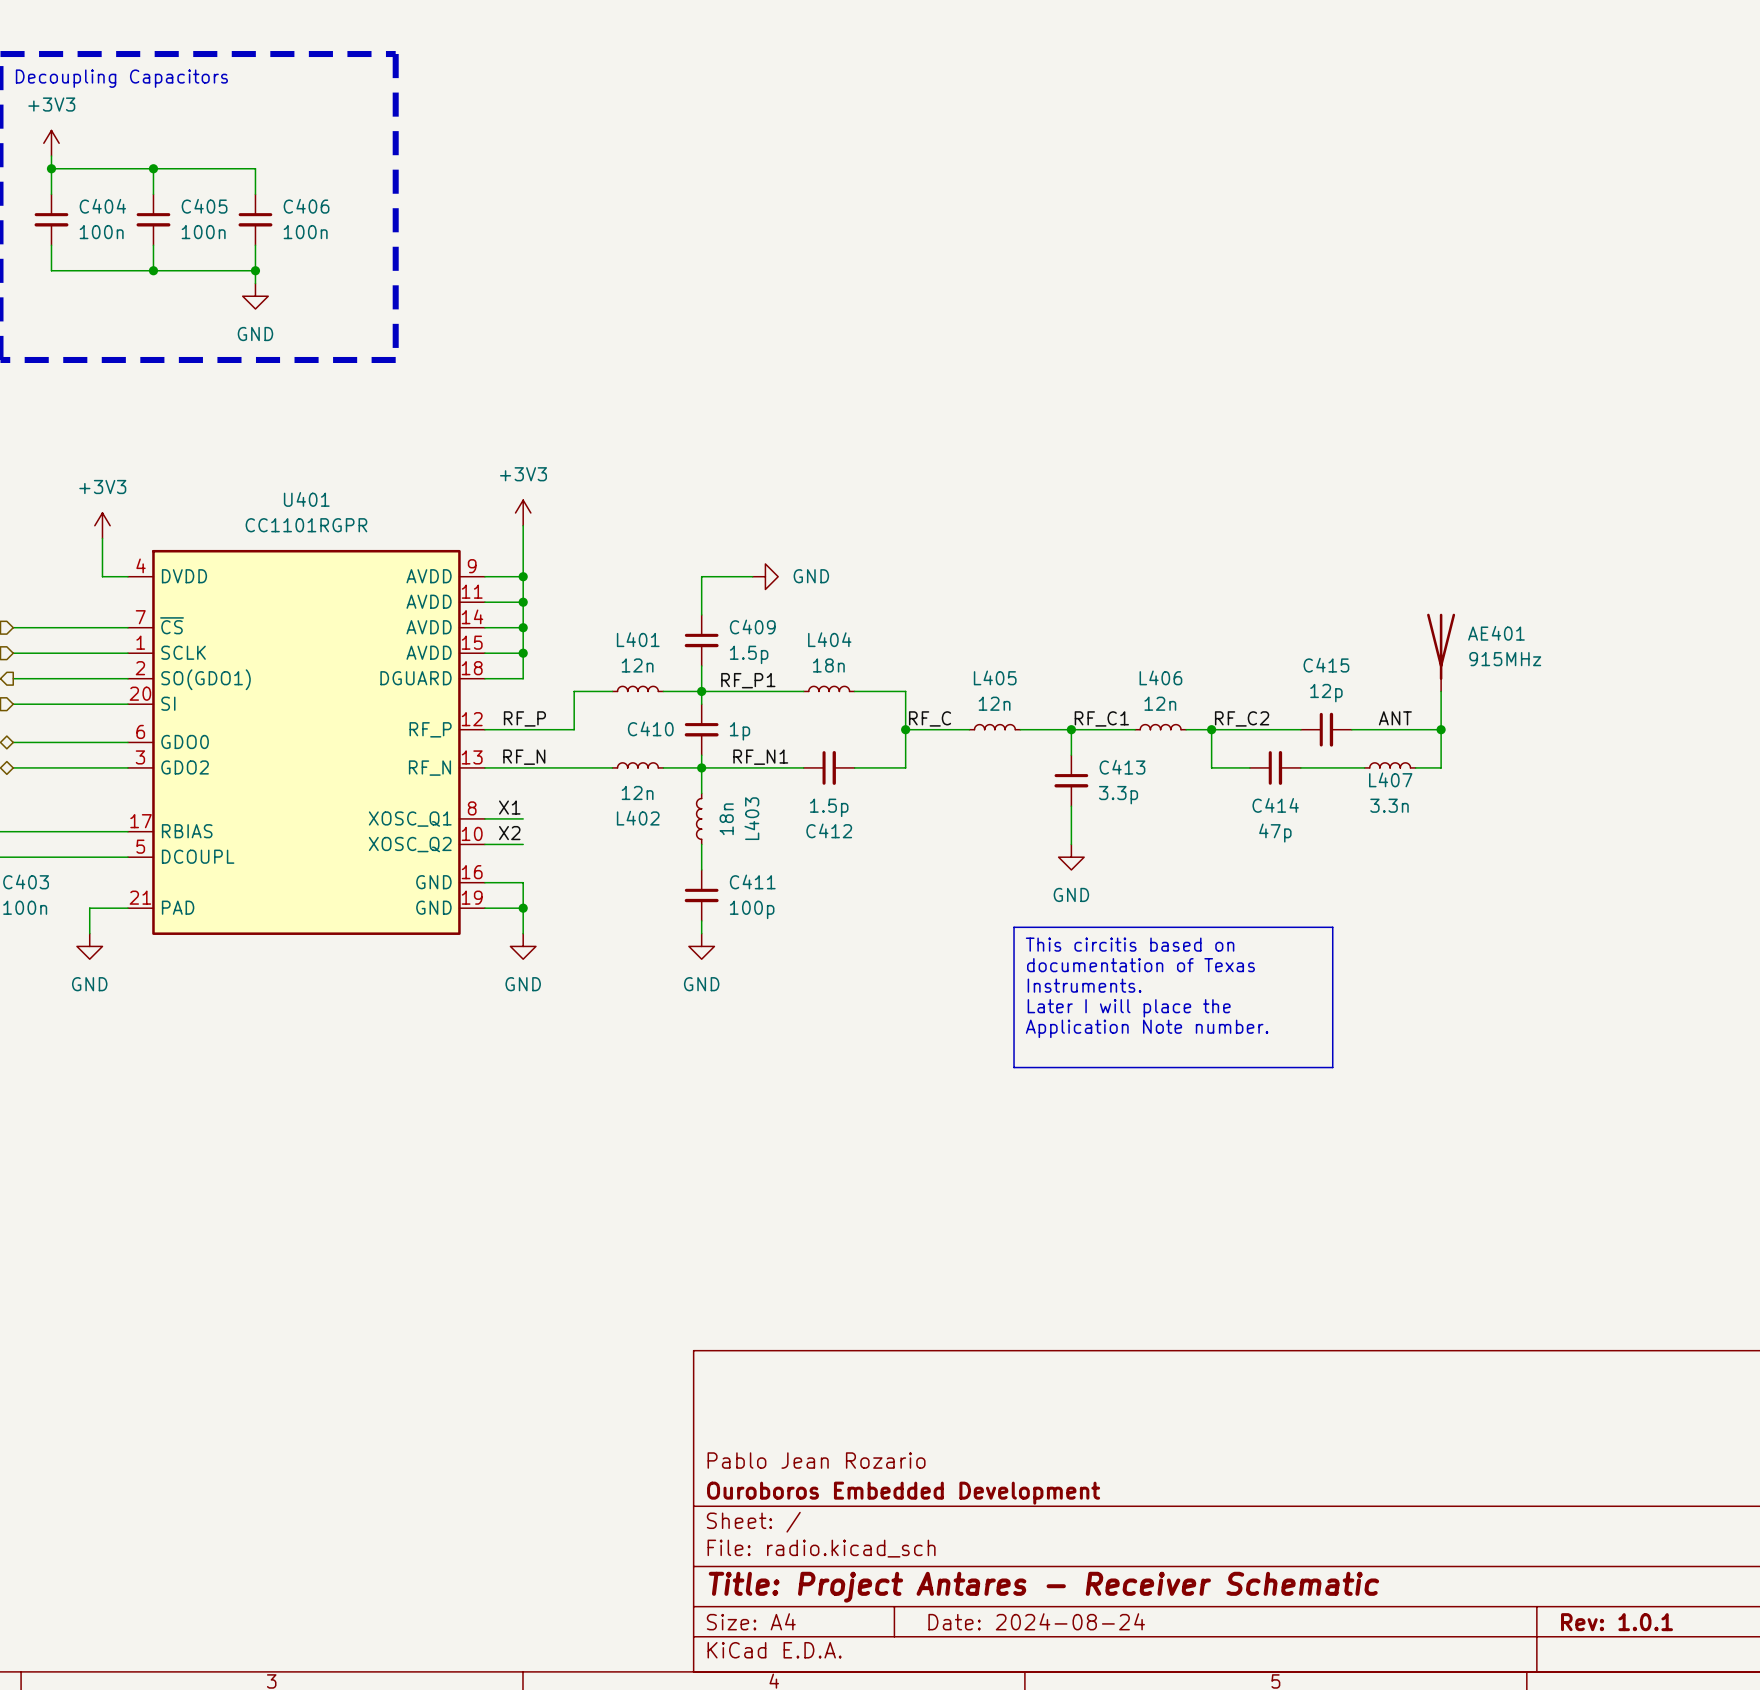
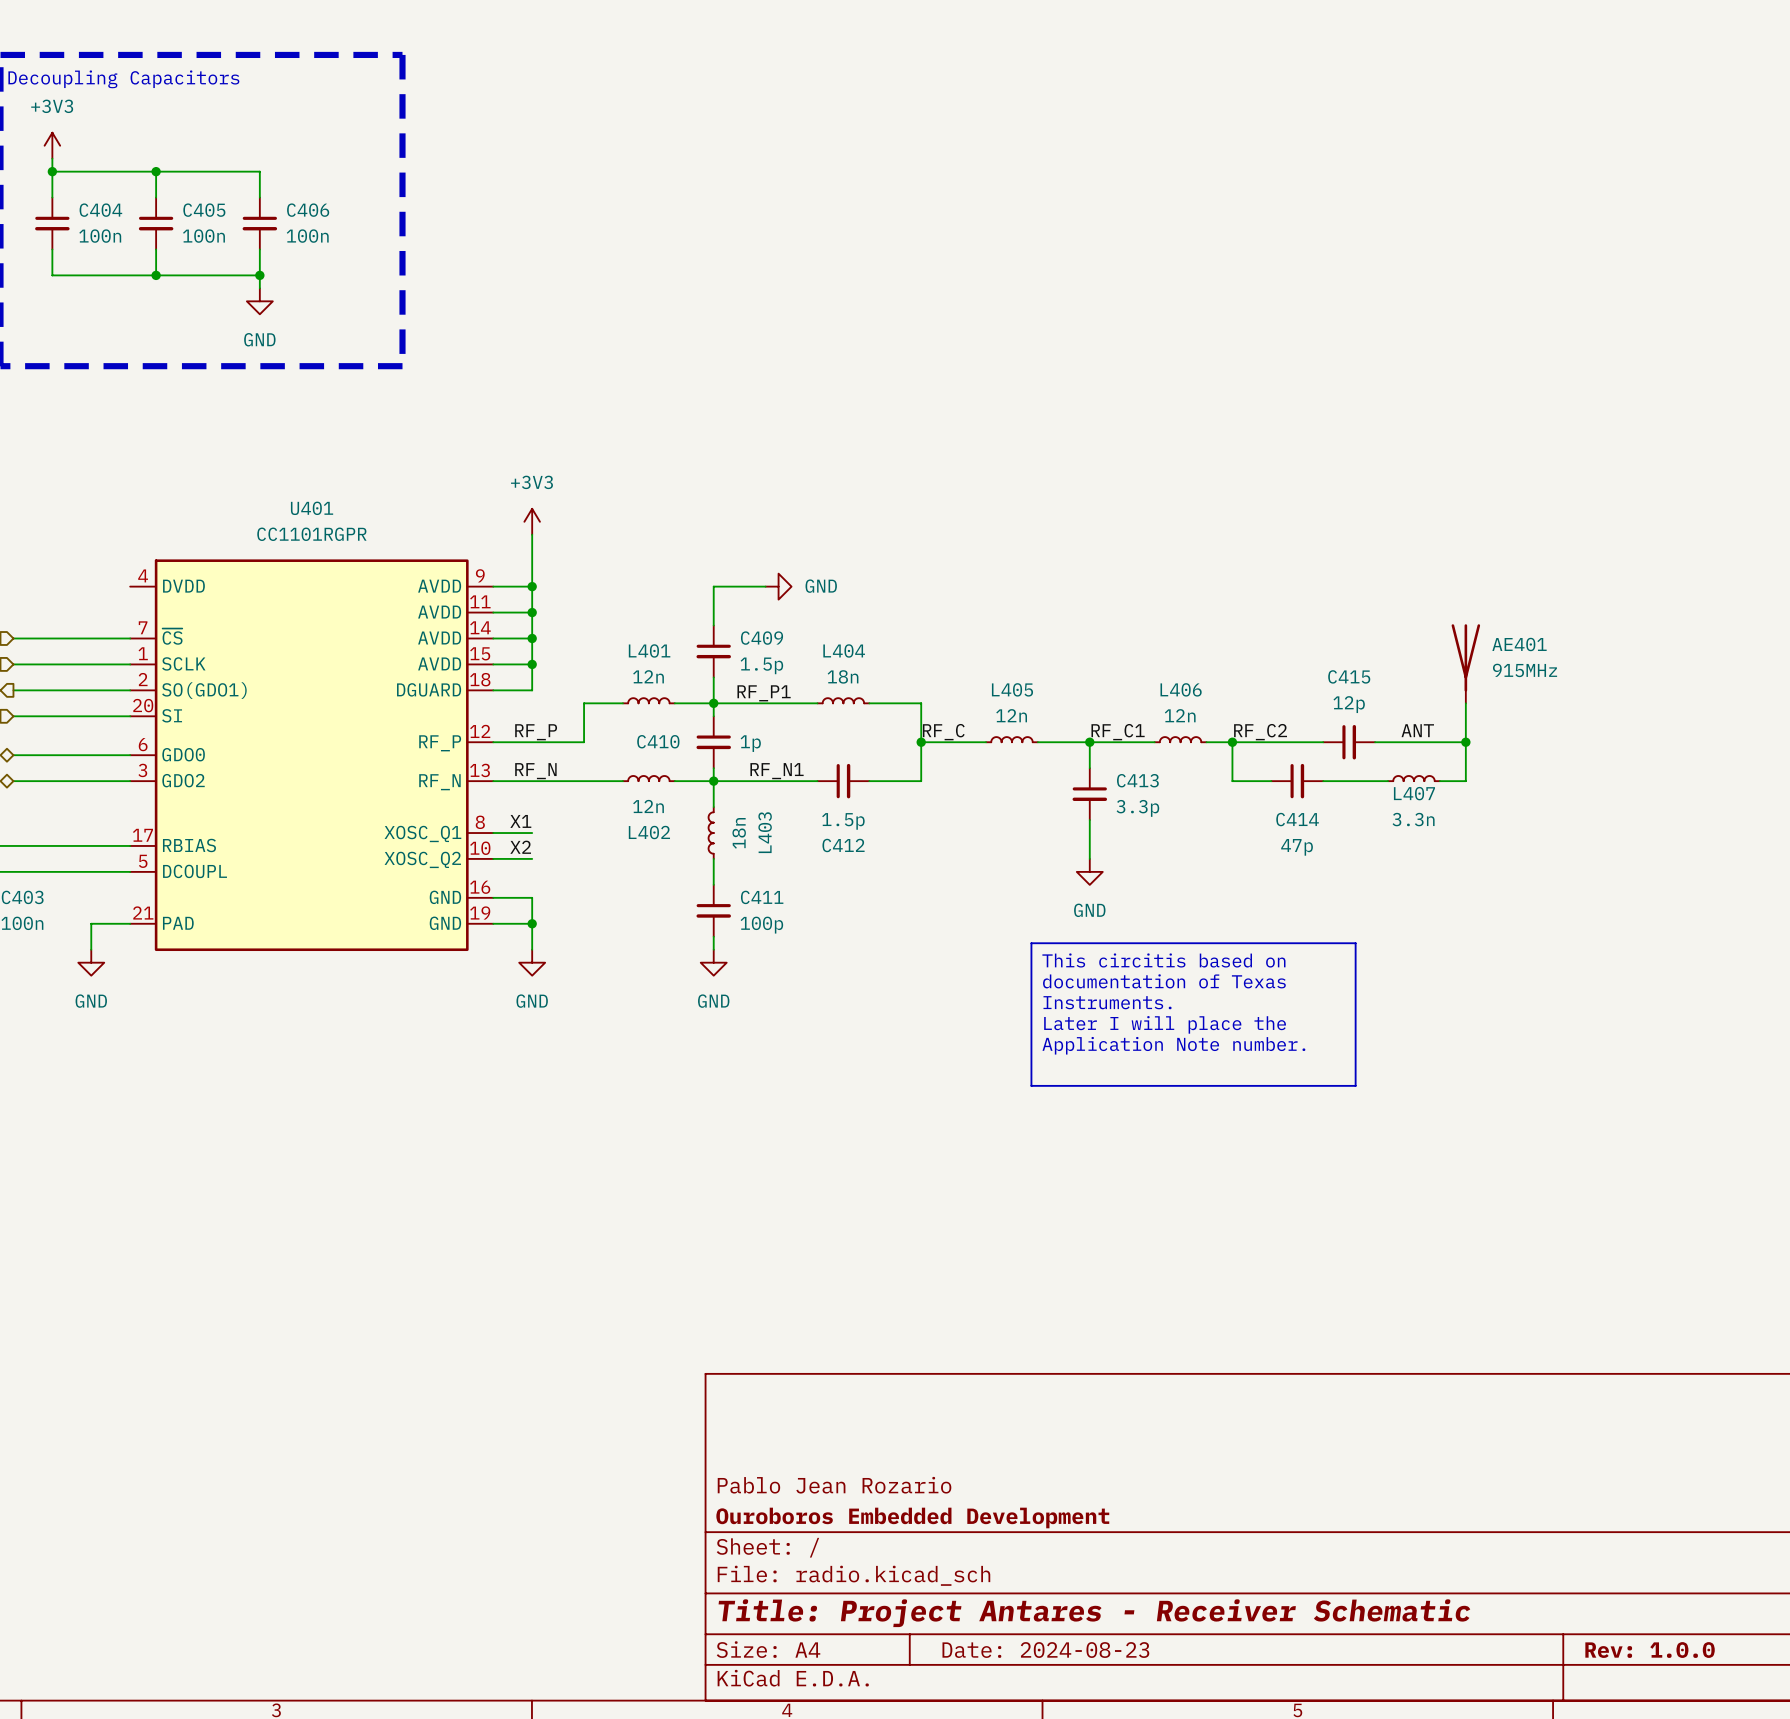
power symbol: +3V3 (102, 525) -> none
wire: (102, 538) (102, 576) (127, 576) -> none
title block: Date: 2024-08-24 (1036, 1621) -> Date: 2024-08-23 (1045, 1650)
title block: Rev: 1.0.1 (1617, 1622) -> Rev: 1.0.0 (1650, 1650)

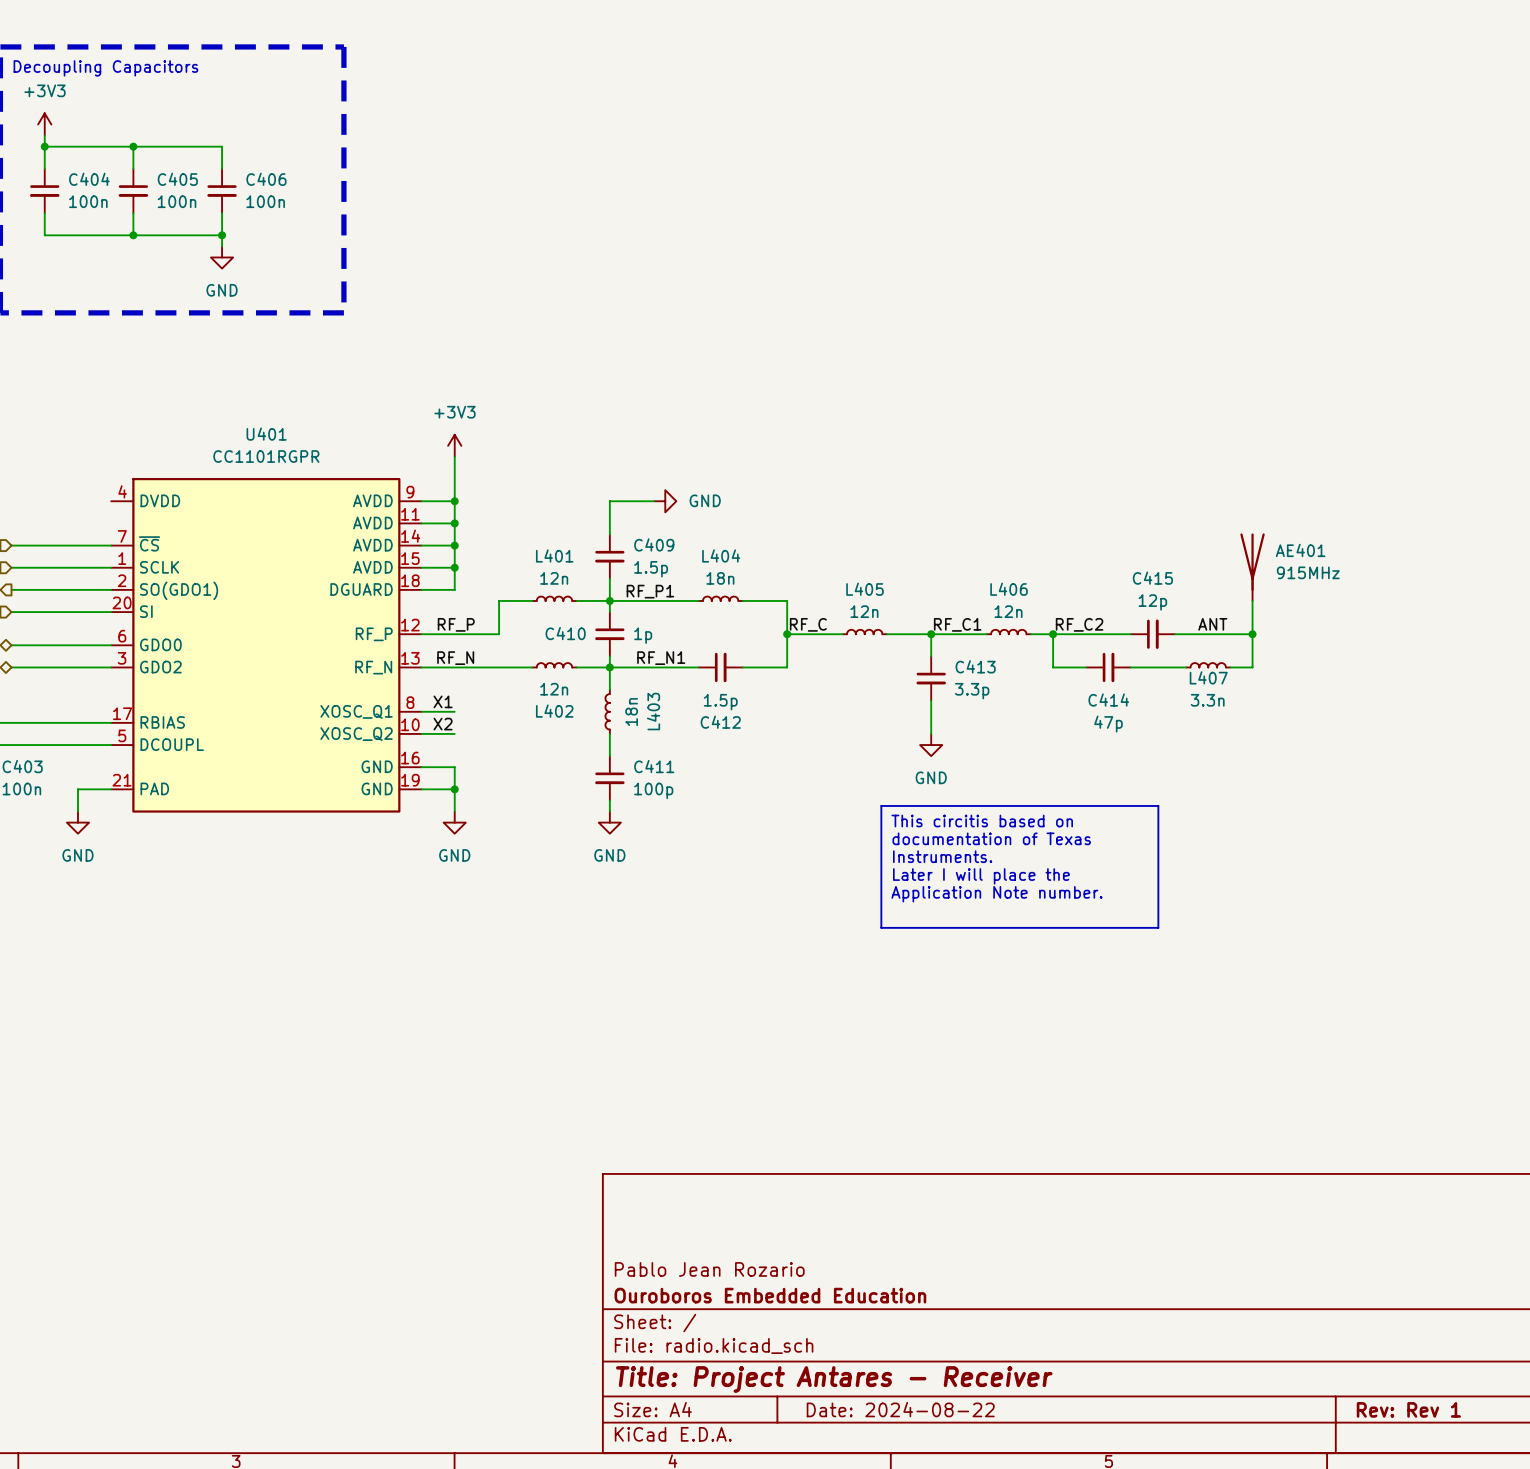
title block: Ouroboros Embedded Development (912, 1517) -> Ouroboros Embedded Education (770, 1295)
title block: Title: Project Antares - Receiver Schematic (1094, 1613) -> Title: Project Antares - Receiver (834, 1379)
title block: Date: 2024-08-23 (1045, 1650) -> Date: 2024-08-22 (900, 1409)
title block: Rev: 1.0.0 (1650, 1650) -> Rev: Rev 1 (1408, 1409)

